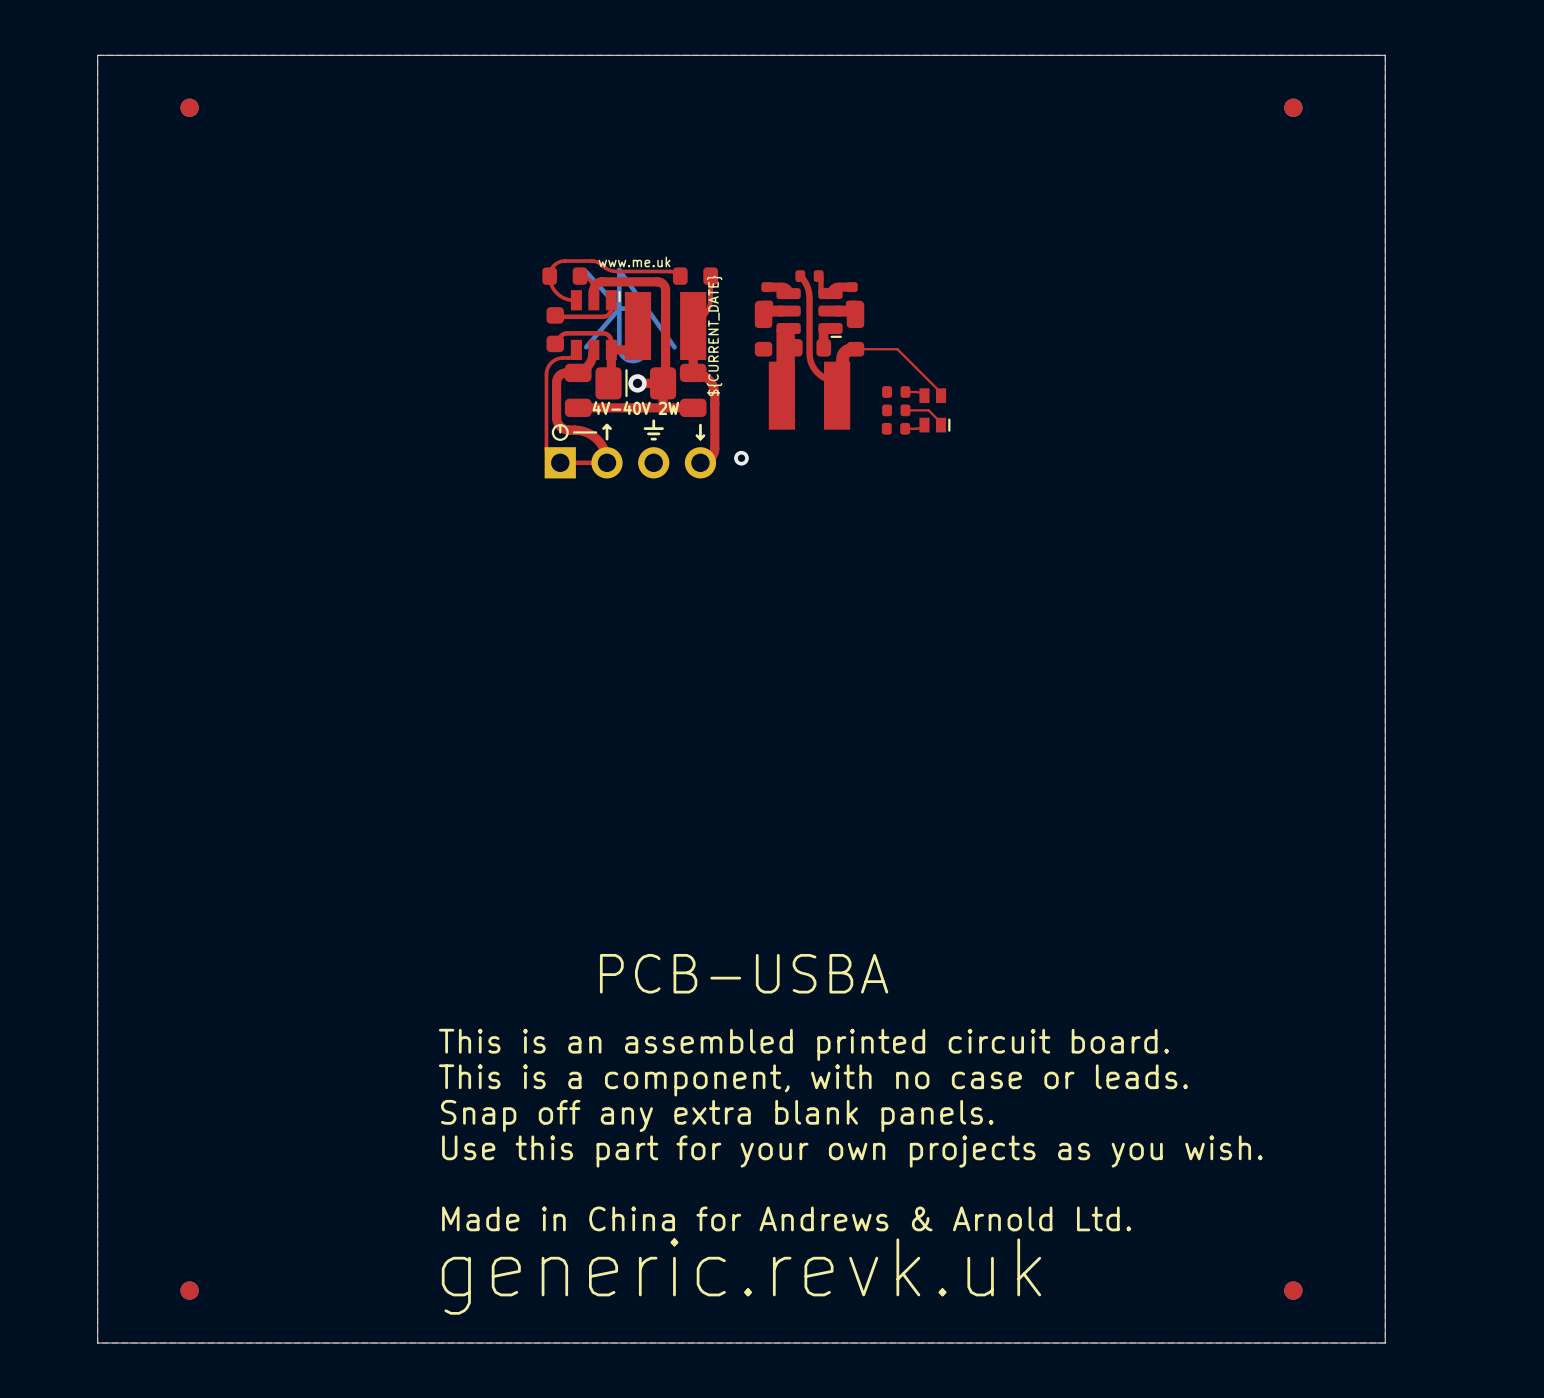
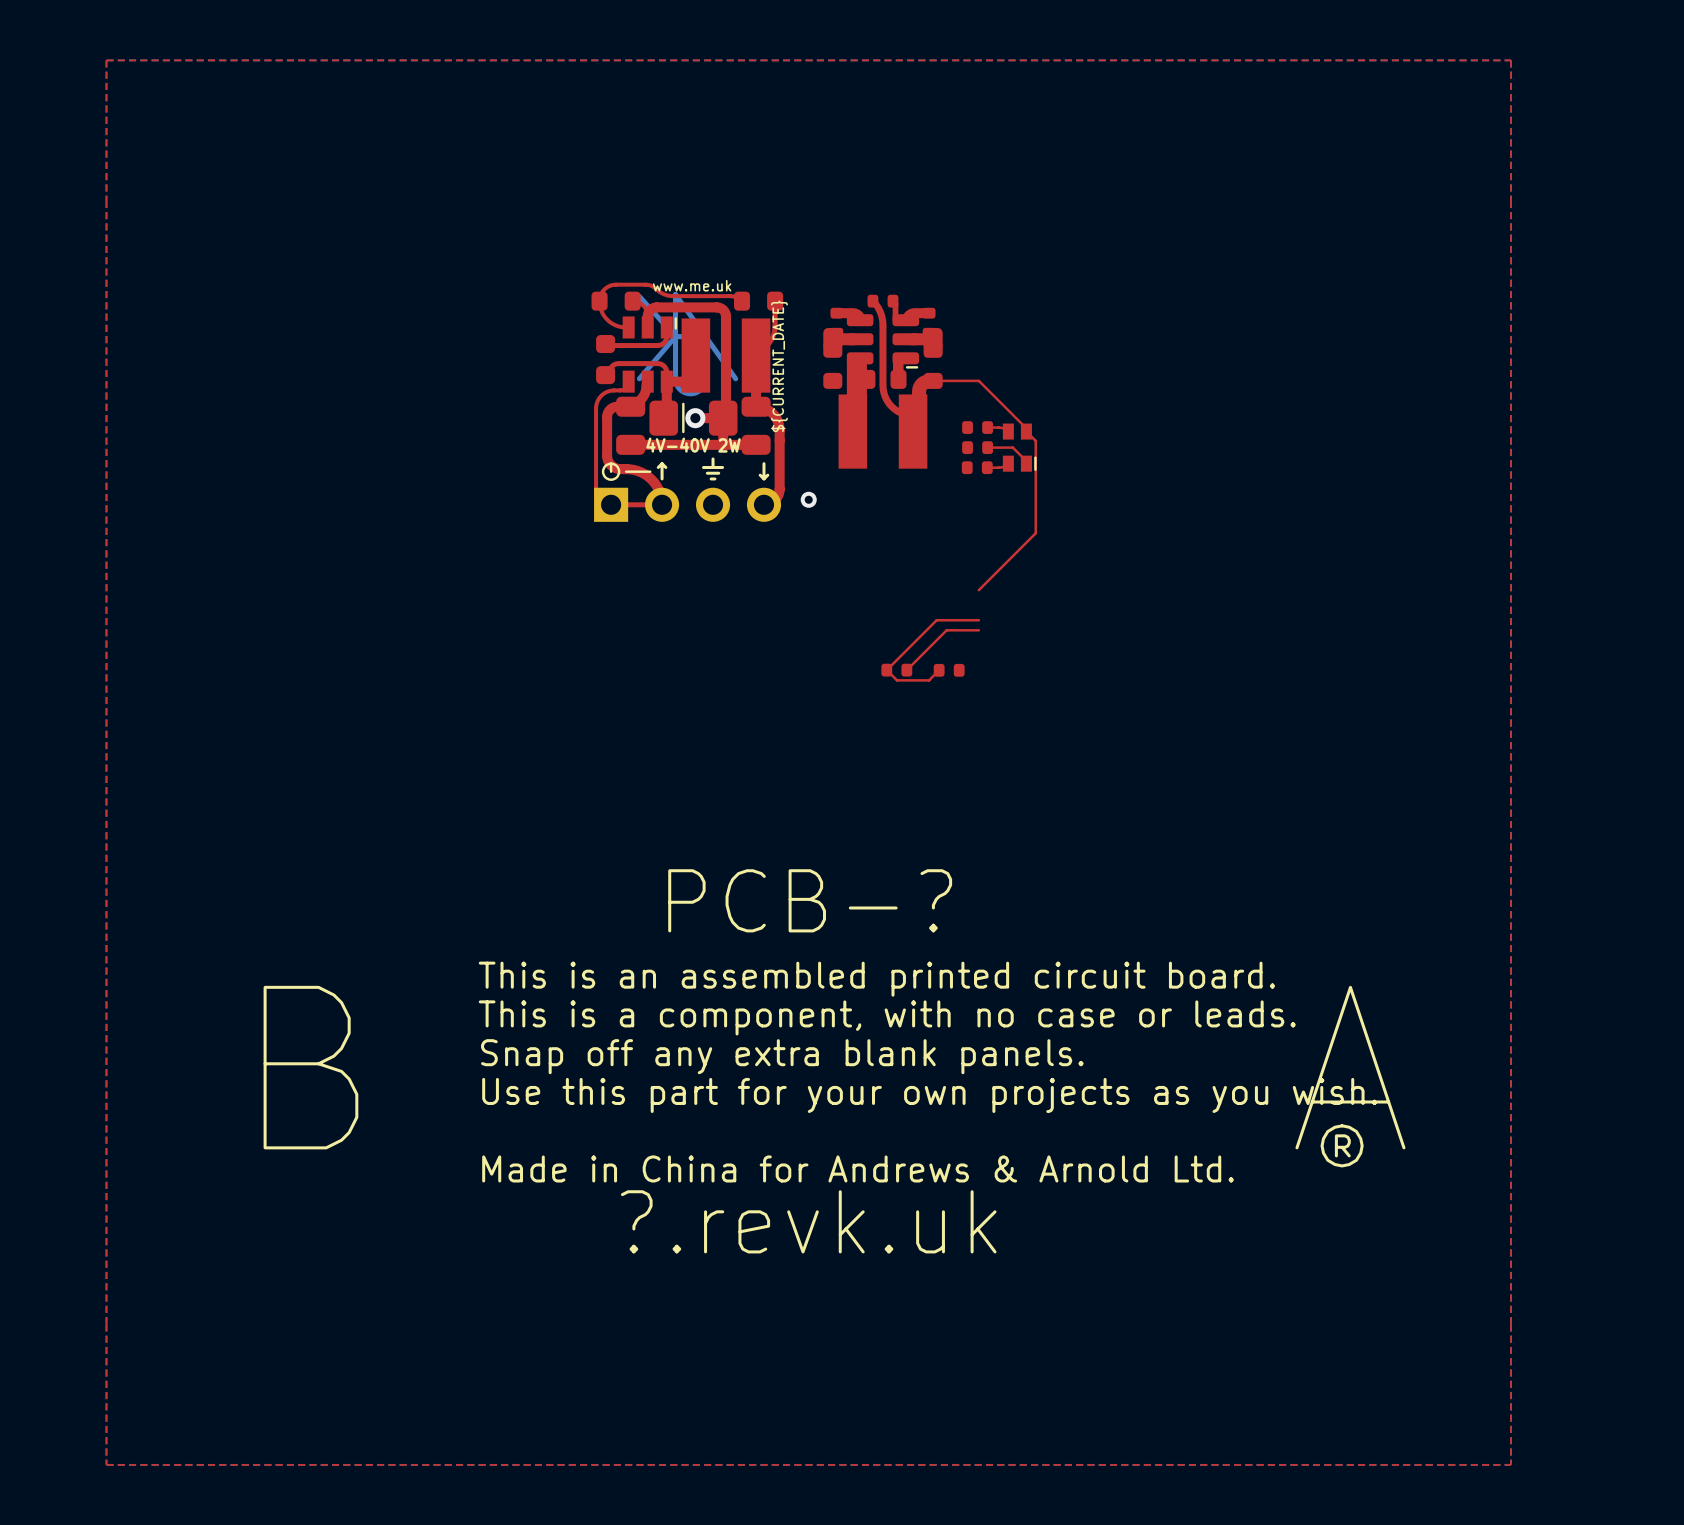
board edge: (97, 55) (1385, 55) (1385, 1343) (97, 1343) (97, 55) -> none
part: (189, 107) -> none
part: (1293, 107) -> none
top track: none -> (1026, 431) (1035, 440) (1035, 533) (978, 590)
top track: none -> (978, 620) (936, 620) (886, 670) (897, 680) (929, 680) (939, 670)
top track: none -> (978, 630) (946, 630) (906, 670)
part: none -> (896, 670)
part: none -> (949, 670)
text: none -> PCB-? (810, 900)
text: PCB-USBA (744, 973) -> none
text: none -> B (310, 1067)
text: none -> A (1350, 1067)
text position: This is an assembled printed circuit board. (803, 1044) -> This is an assembled printed circuit board. (876, 979)
text: none -> ® (1342, 1145)
text position: This is a component, with no case or leads. (813, 1080) -> This is a component, with no case or leads. (887, 1017)
text position: Snap off any extra blank panels. (717, 1115) -> Snap off any extra blank panels. (782, 1056)
text: none -> ?.revk.uk (808, 1221)
text position: Use this part for your own projects as you wish. (852, 1151) -> Use this part for your own projects as you wish. (929, 1095)
text position: Made in China for Andrews & Arnold Ltd. (786, 1218) -> Made in China for Andrews & Arnold Ltd. (858, 1168)
text: generic.revk.uk (741, 1276) -> none
part: (189, 1290) -> none
part: (1293, 1290) -> none

